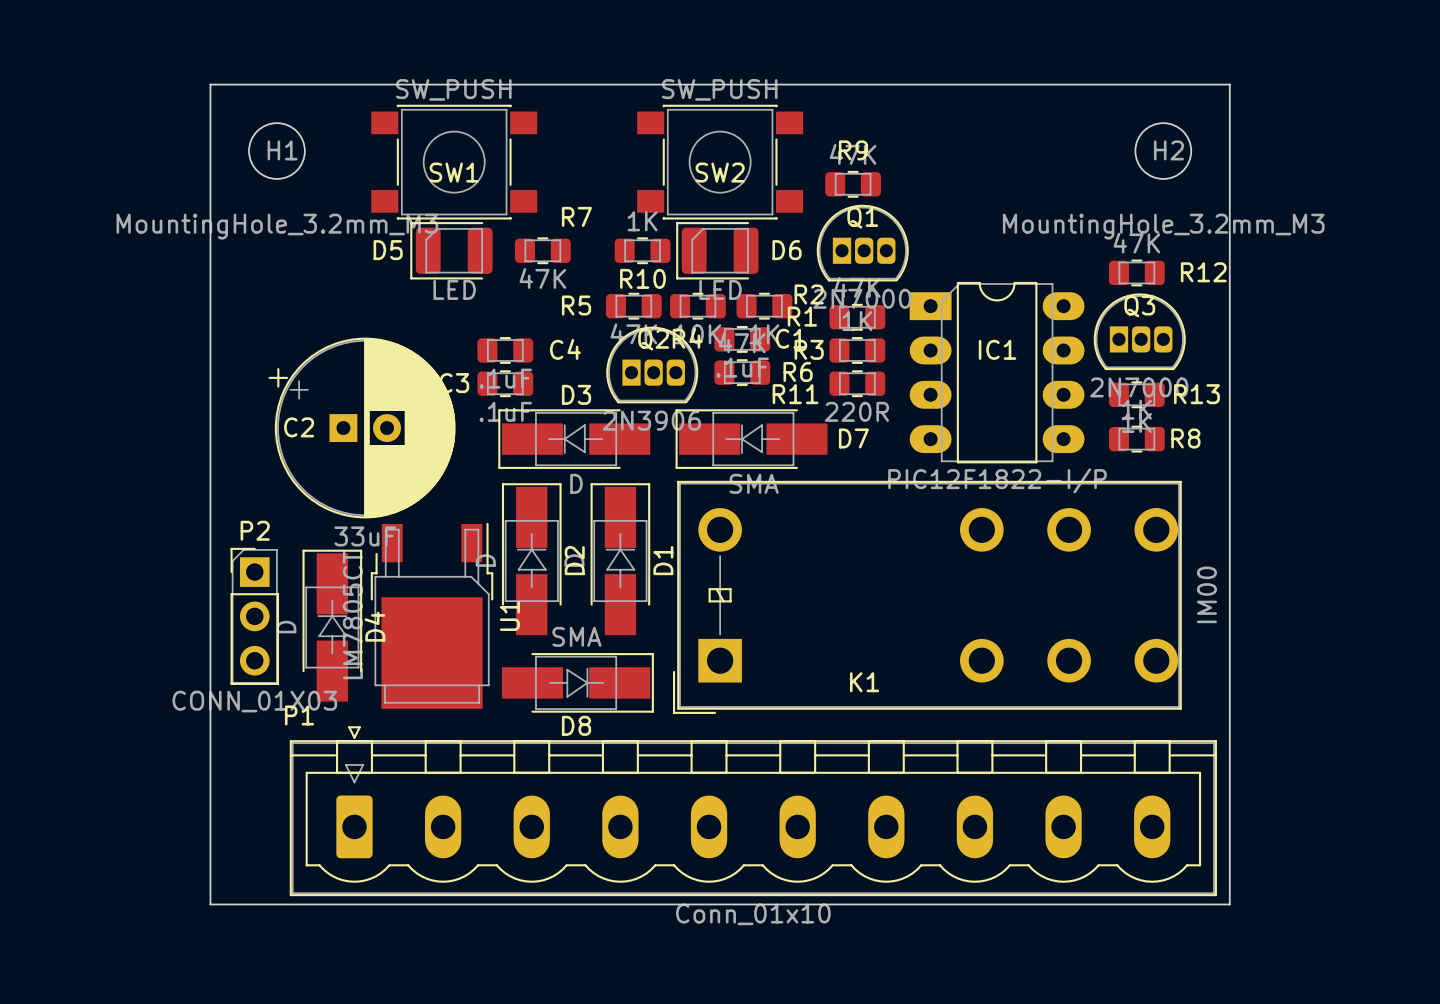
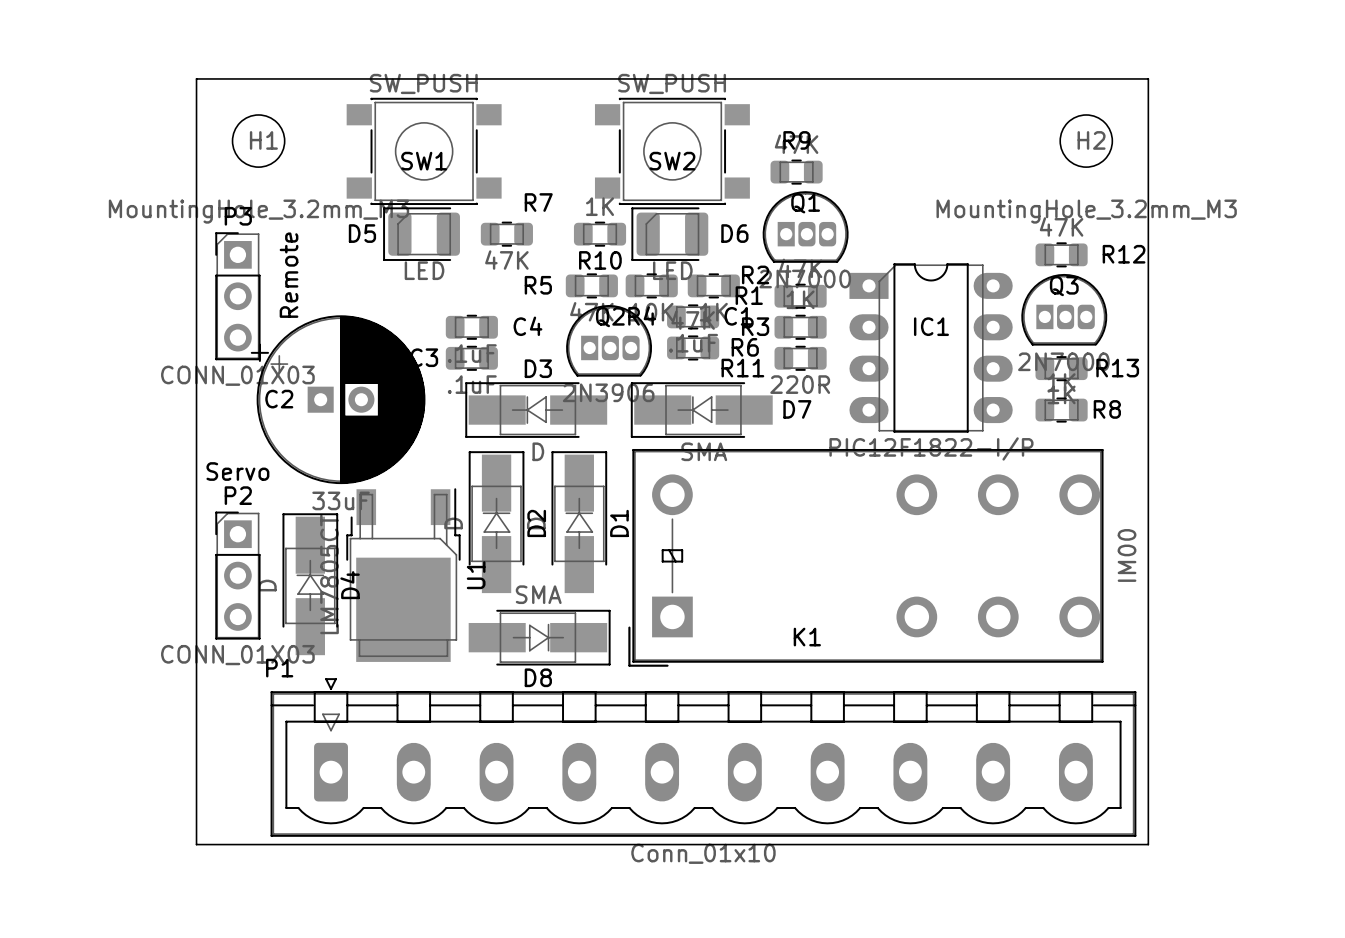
text: none -> Remote (289, 275)
P3: none -> CONN_01X03 (237, 296)
text: none -> Servo (237, 471)

